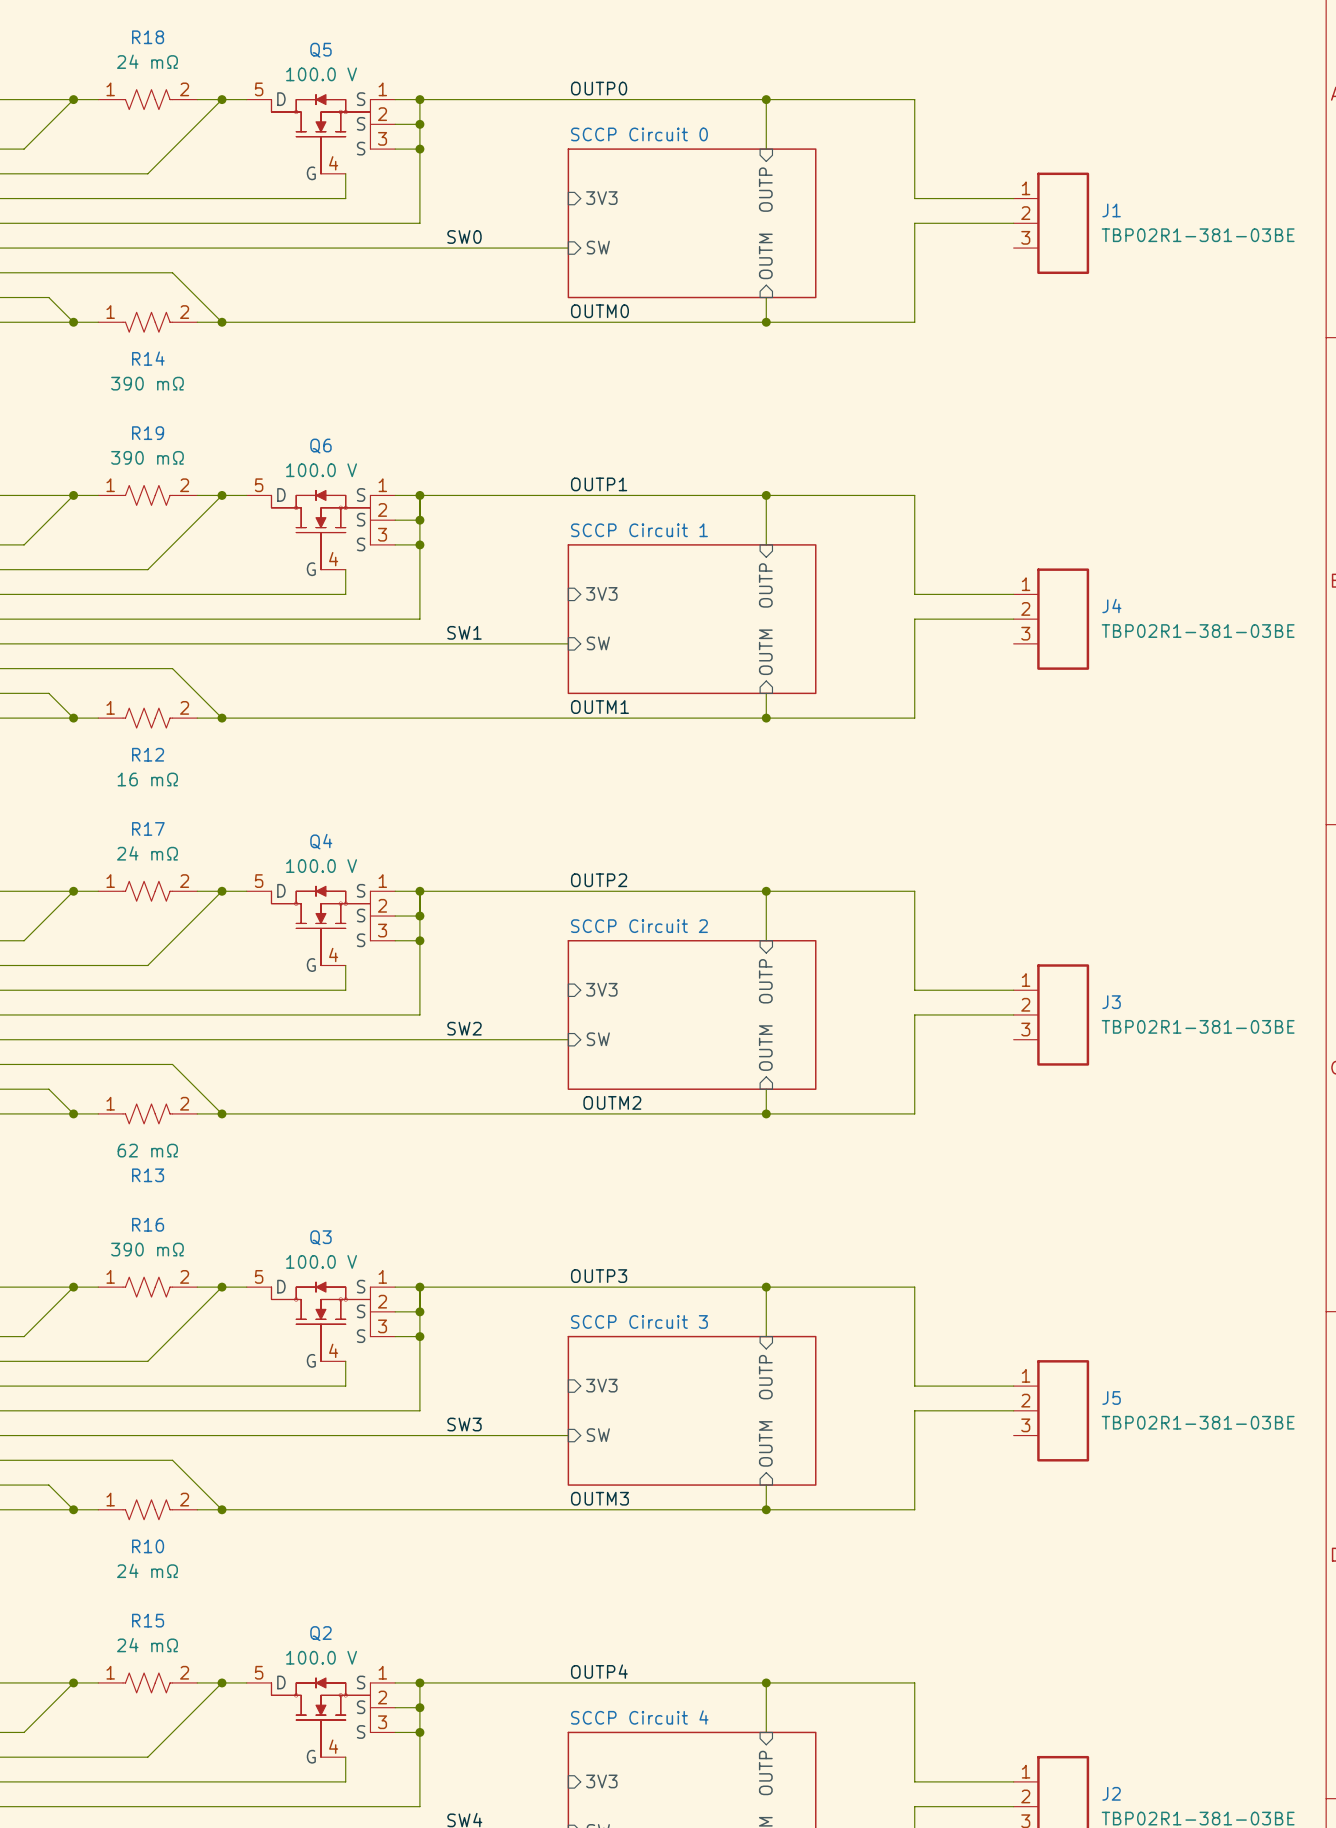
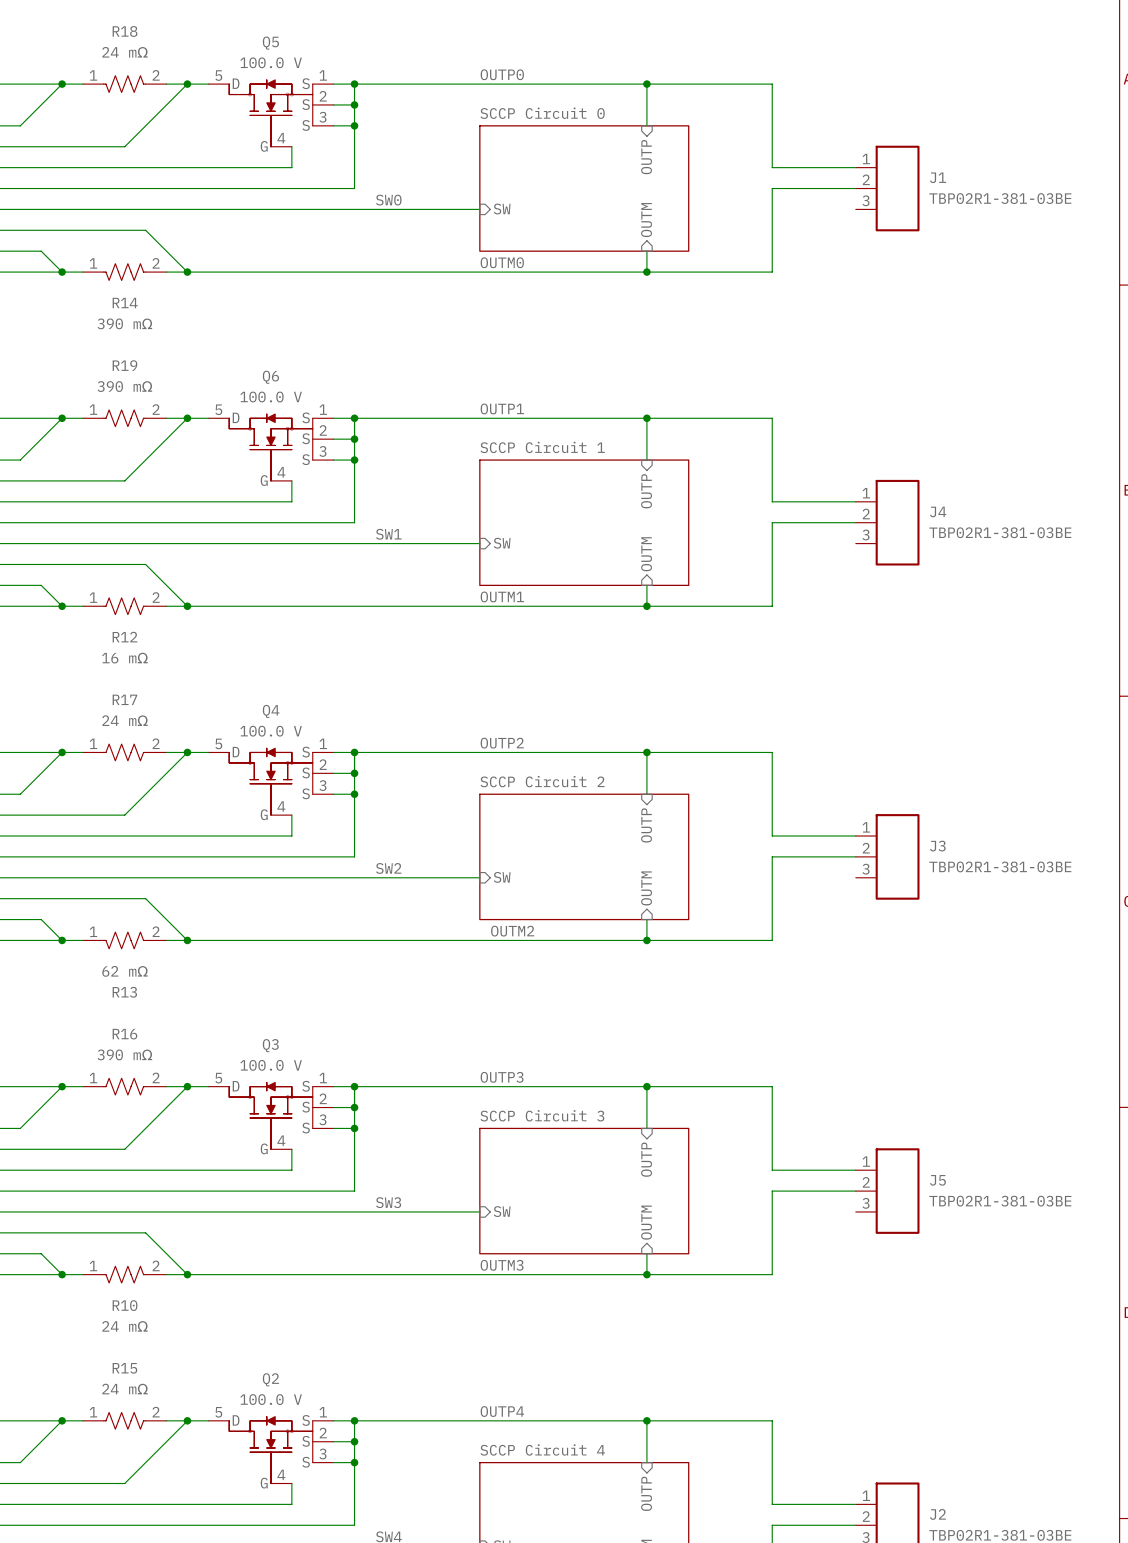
sheet pin: 3V3 (601, 198) -> none
sheet pin: 3V3 (601, 593) -> none
sheet pin: 3V3 (601, 989) -> none
sheet pin: 3V3 (601, 1385) -> none
sheet pin: 3V3 (601, 1781) -> none

